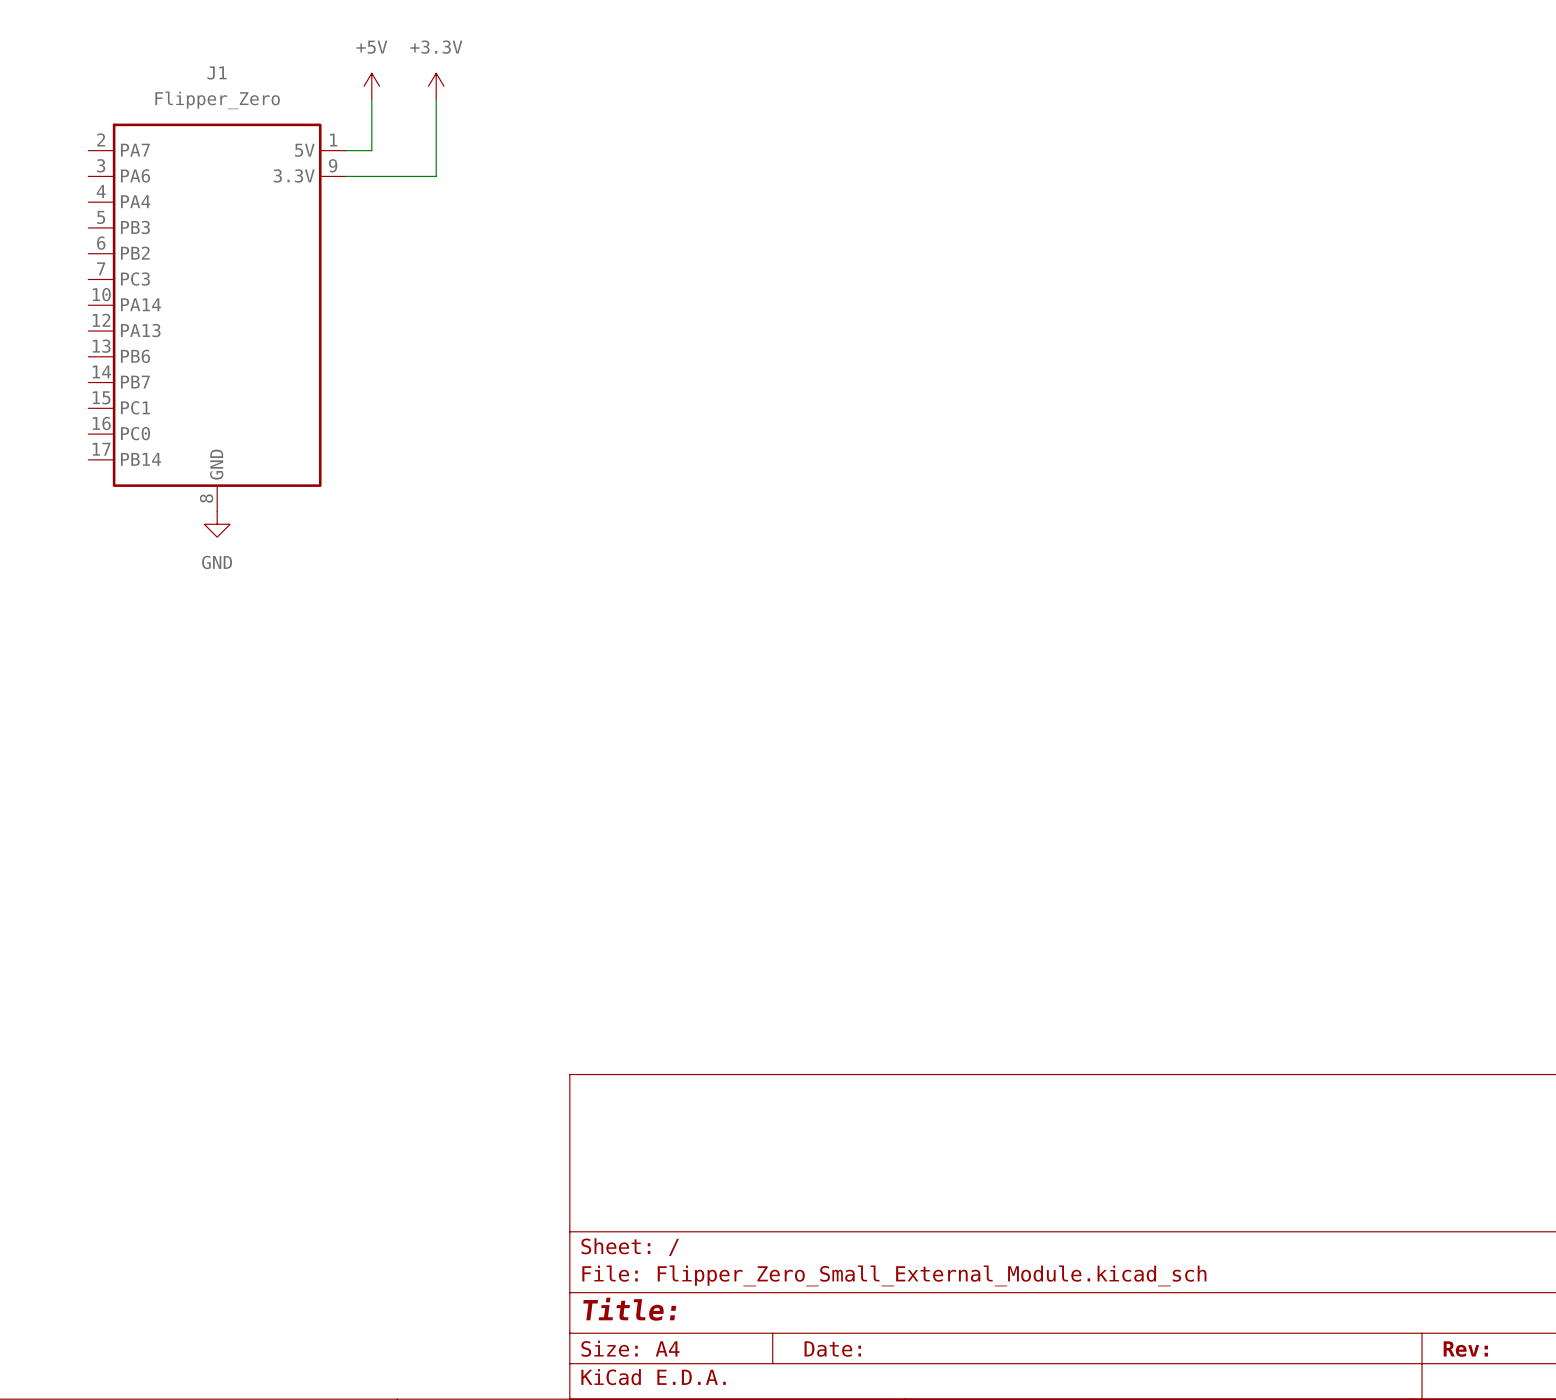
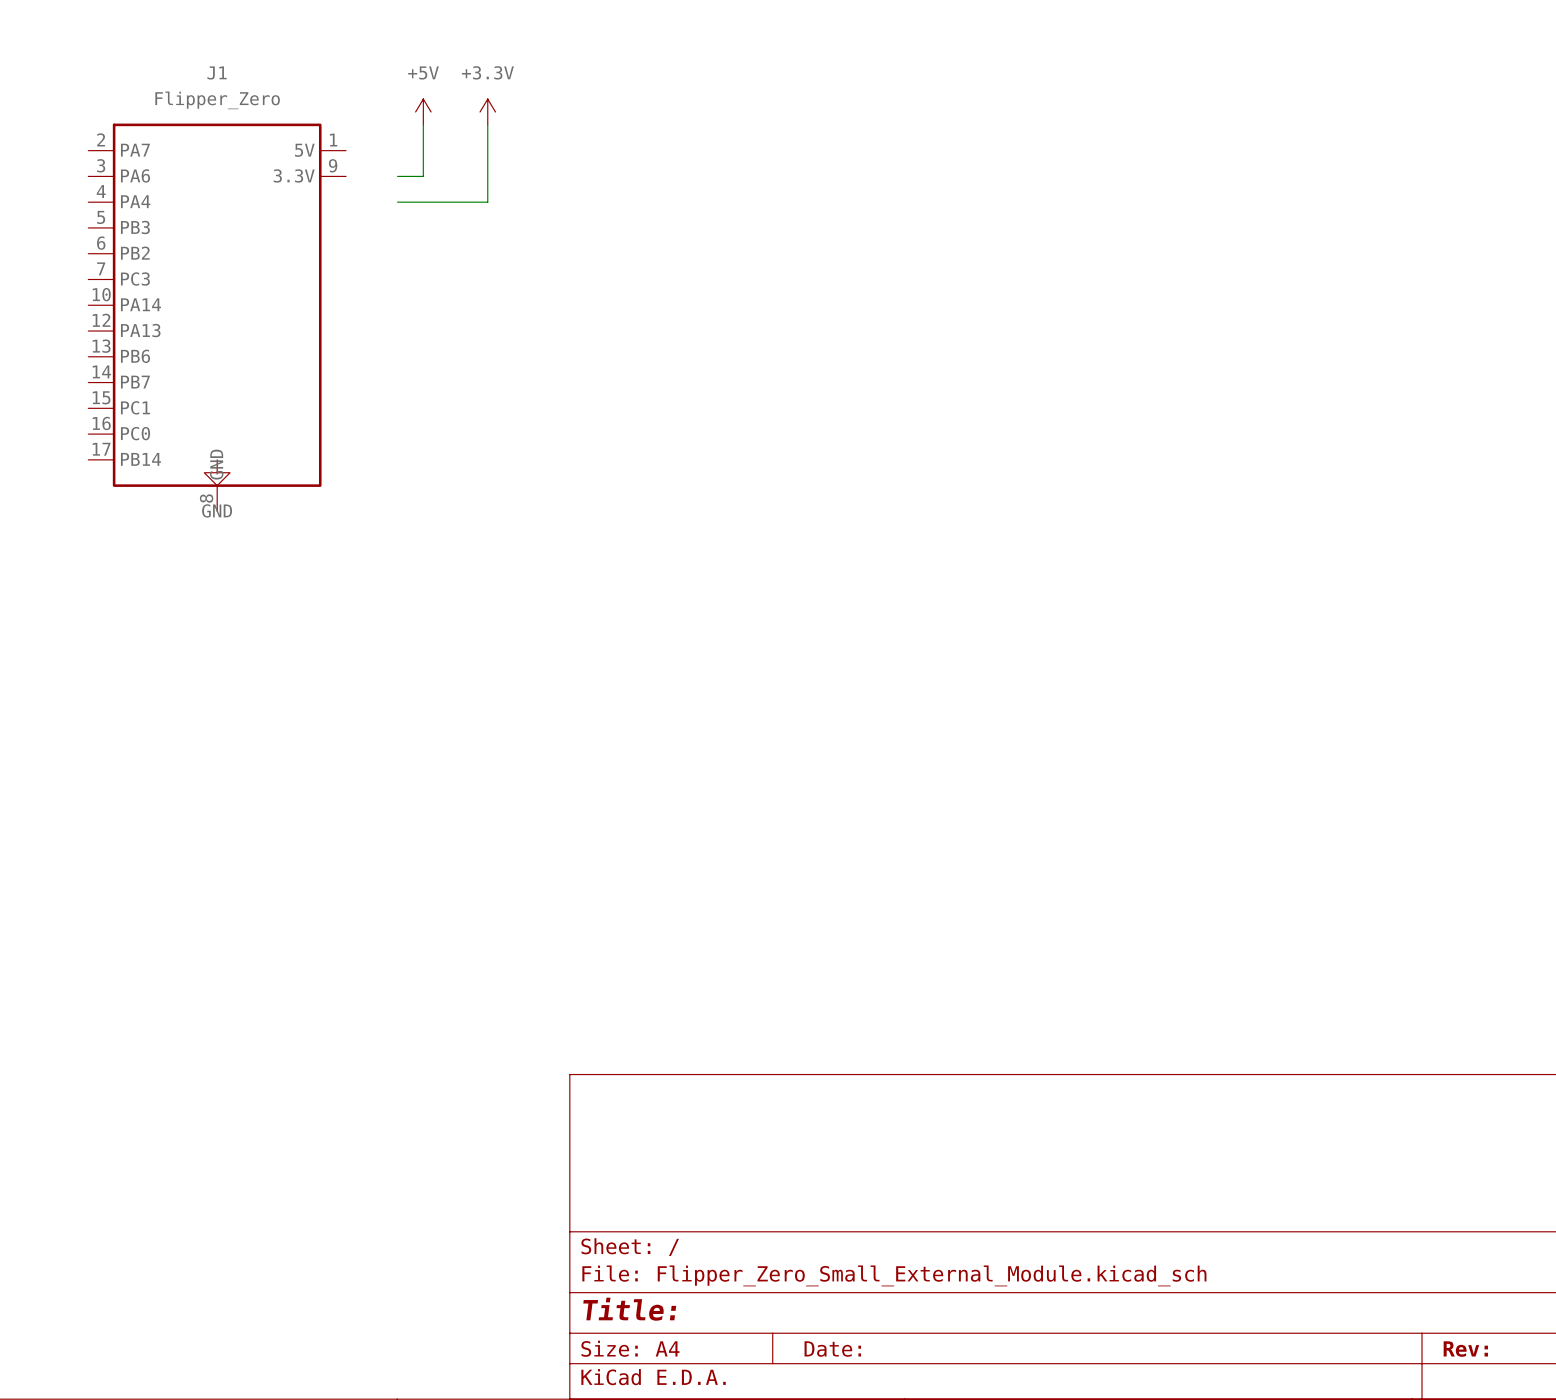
power symbol position: +5V (371, 86) -> +5V (423, 111)
power symbol position: +3.3V (436, 86) -> +3.3V (487, 111)
wire: (371, 99) (371, 150) (346, 150) -> none
wire: (436, 99) (436, 176) (423, 176) -> (423, 124) (423, 176)
wire: none -> (487, 124) (487, 202) (397, 202)
wire: (346, 176) (397, 176) -> none
power symbol position: GND (217, 524) -> GND (217, 472)

